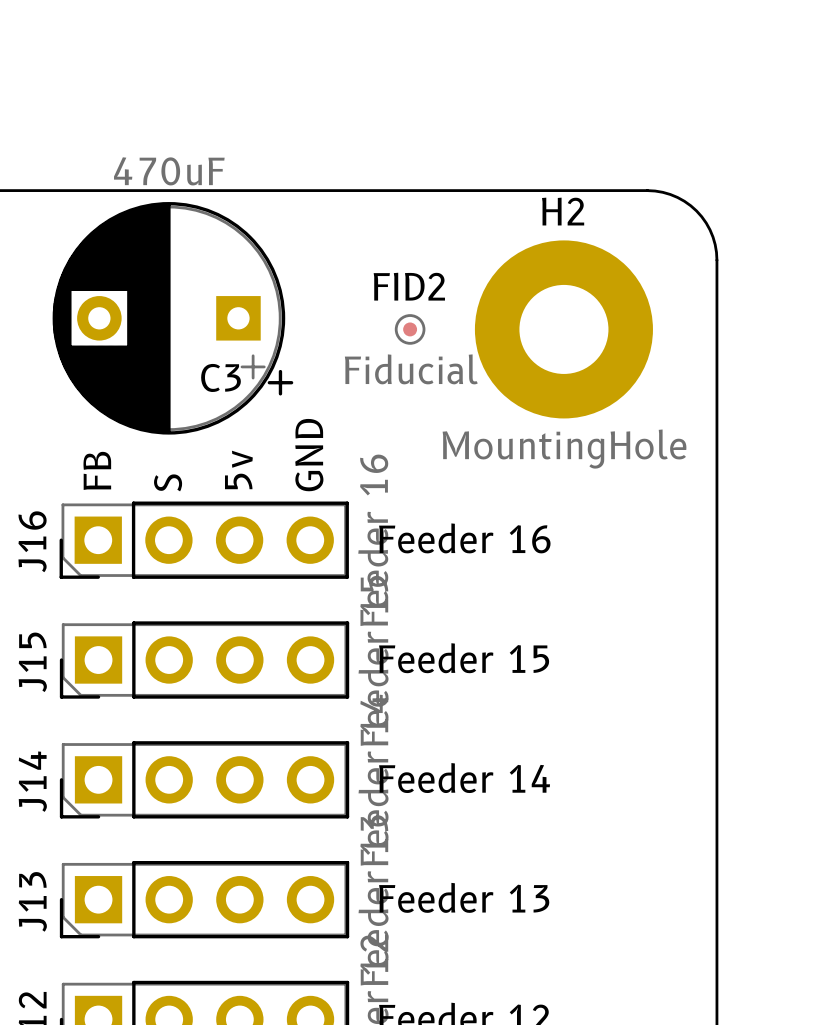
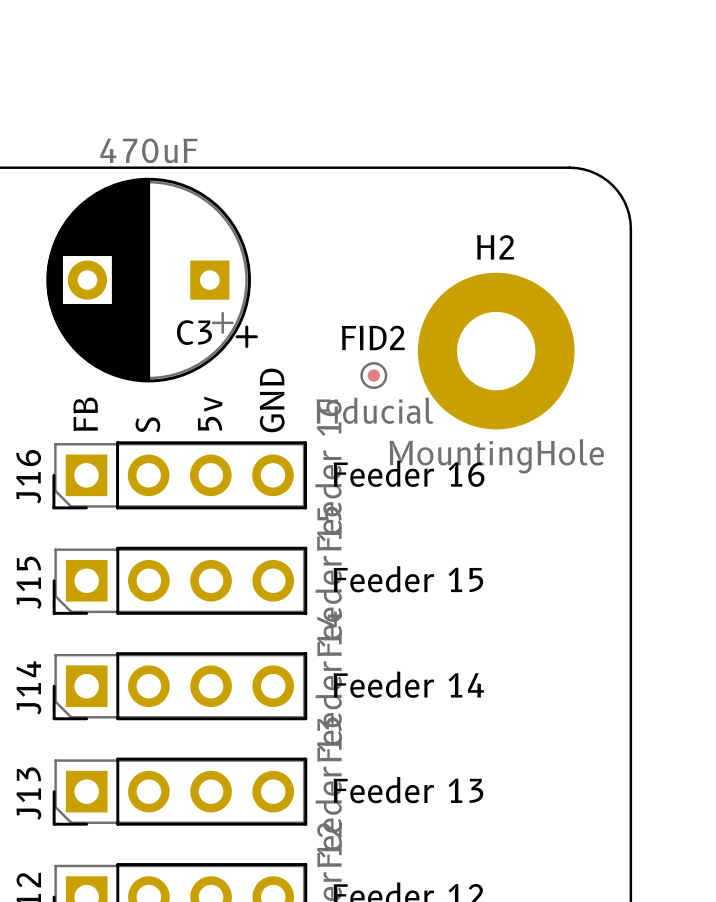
FID2 position: (410, 329) -> (373, 375)
H2 position: (563, 329) -> (496, 351)

